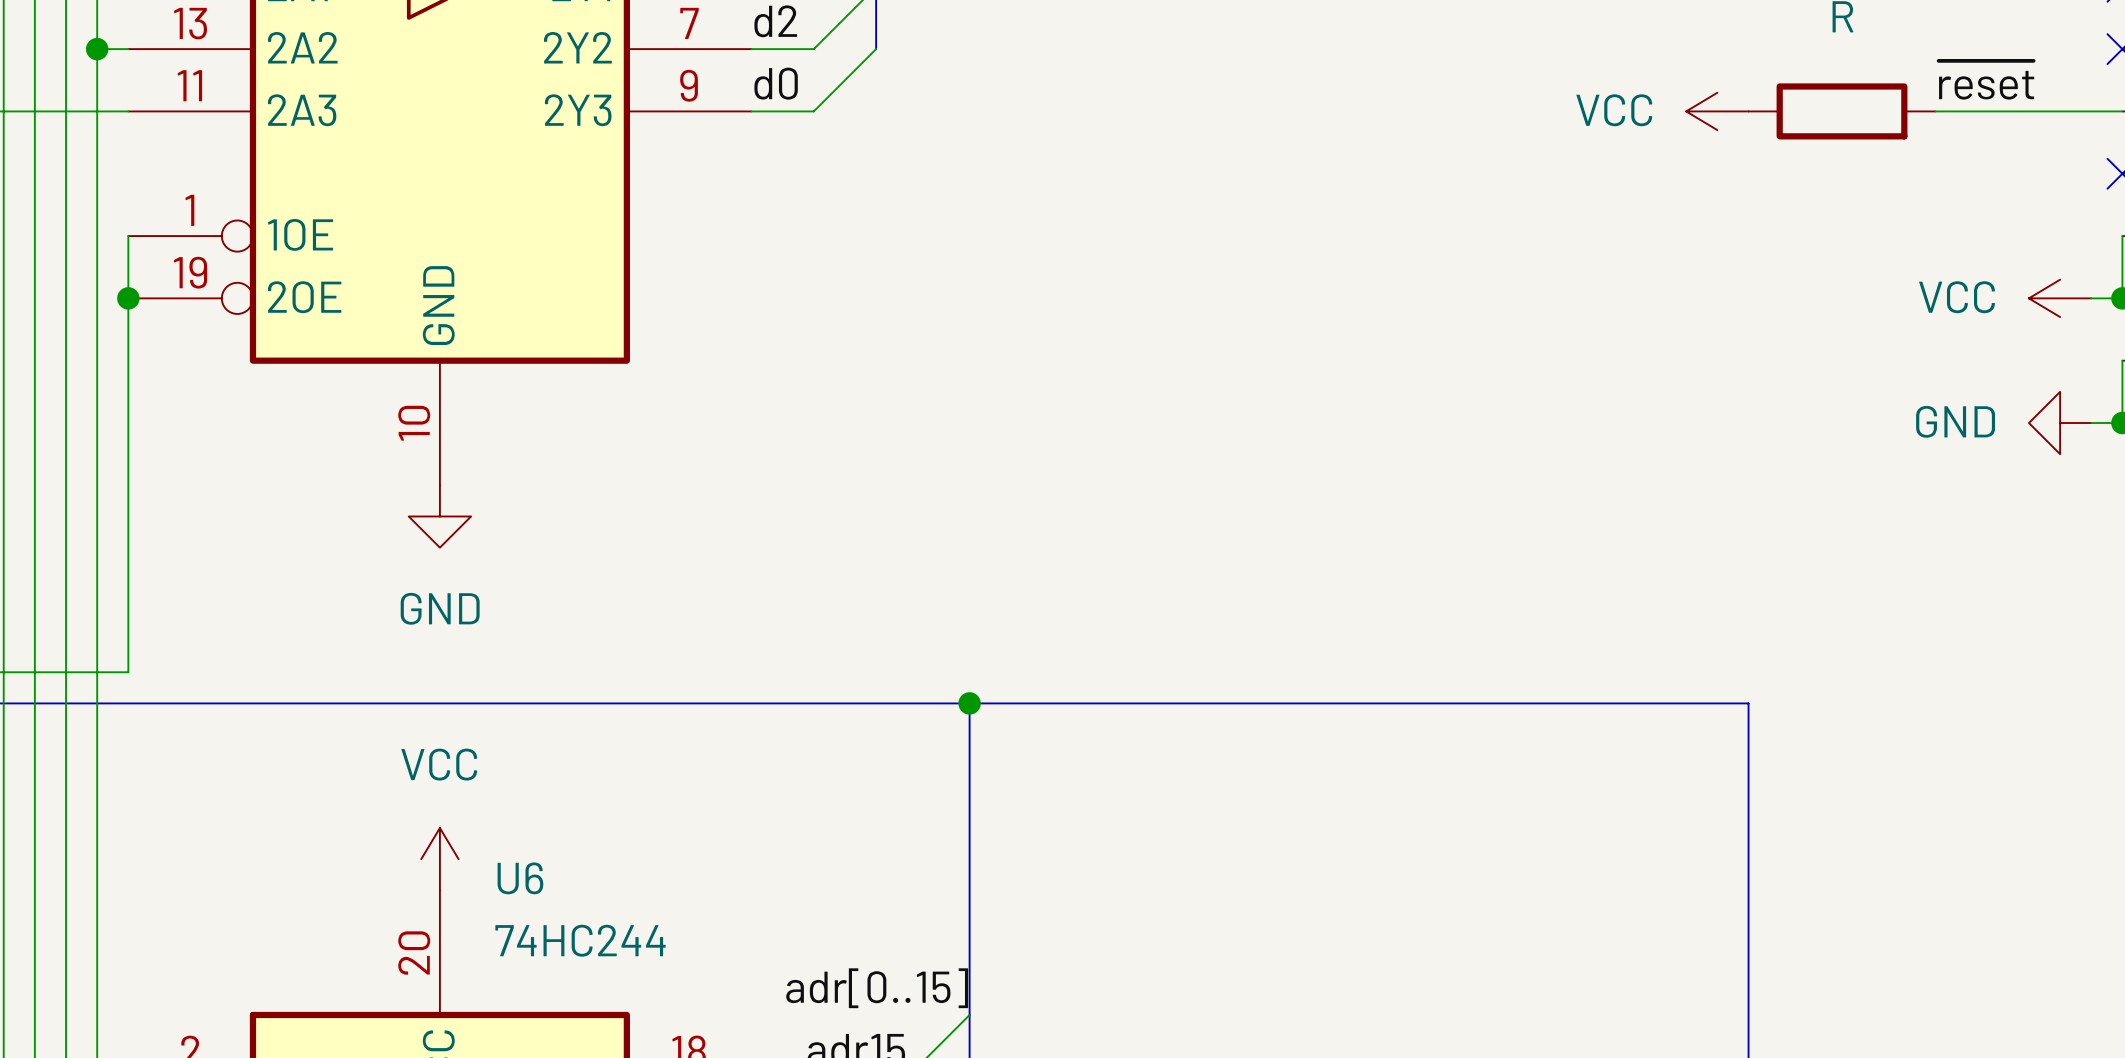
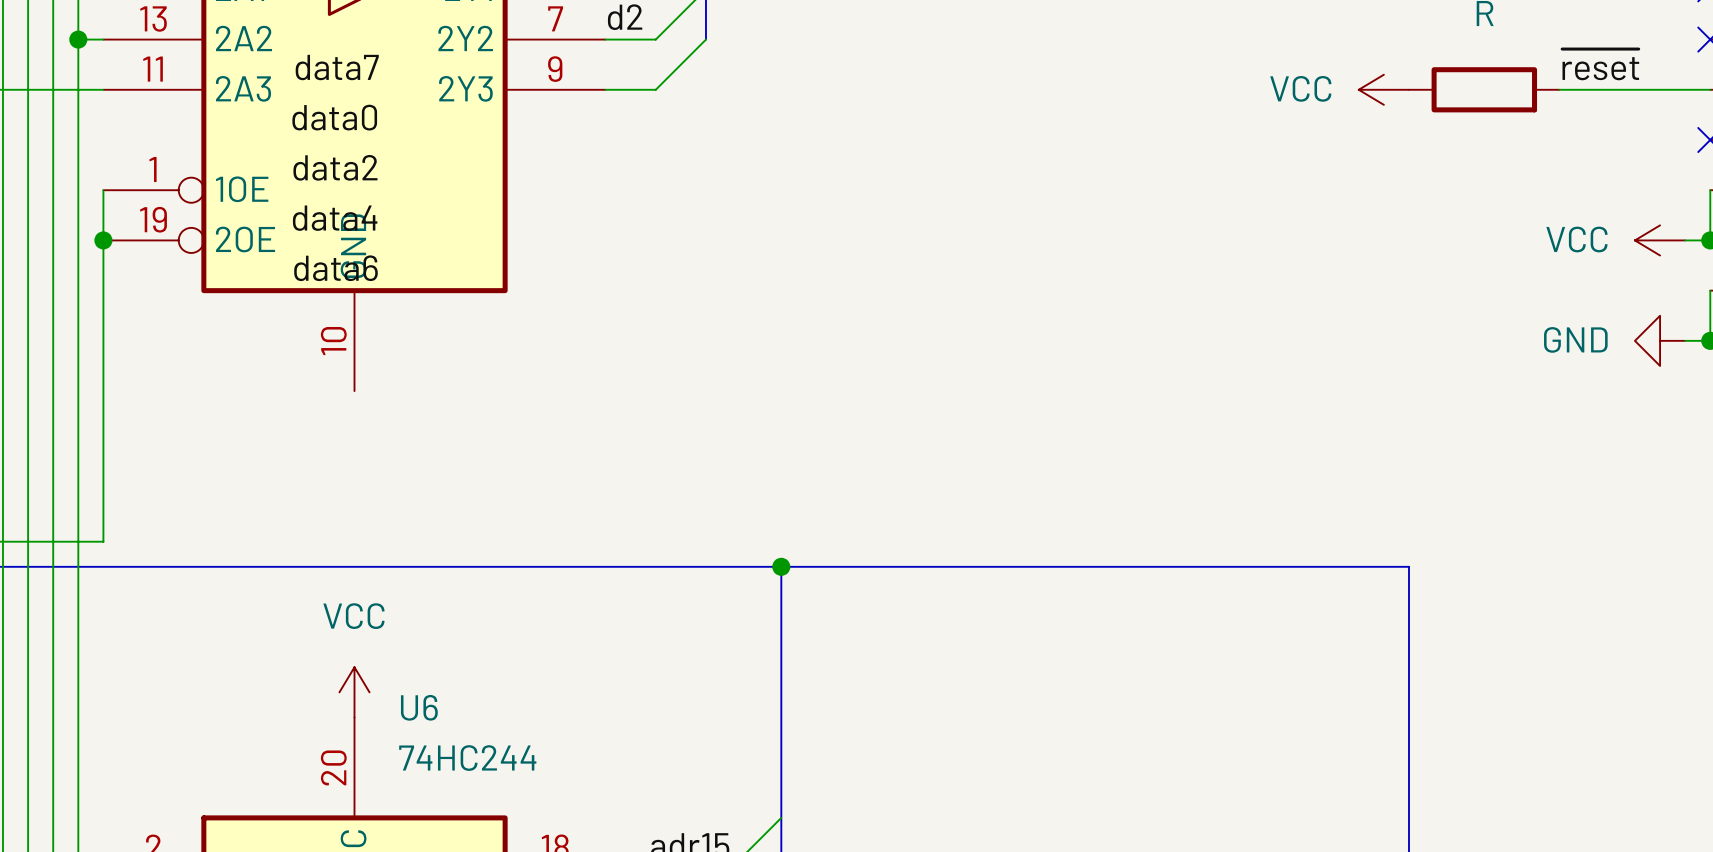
label: none -> data7 (337, 67)
label: d0 (776, 83) -> none
label: none -> data0 (334, 117)
label: none -> data2 (335, 167)
label: none -> data4 (335, 218)
label: none -> data6 (335, 268)
power symbol: GND (439, 516) -> none
label: adr[0..15] (877, 988) -> none

